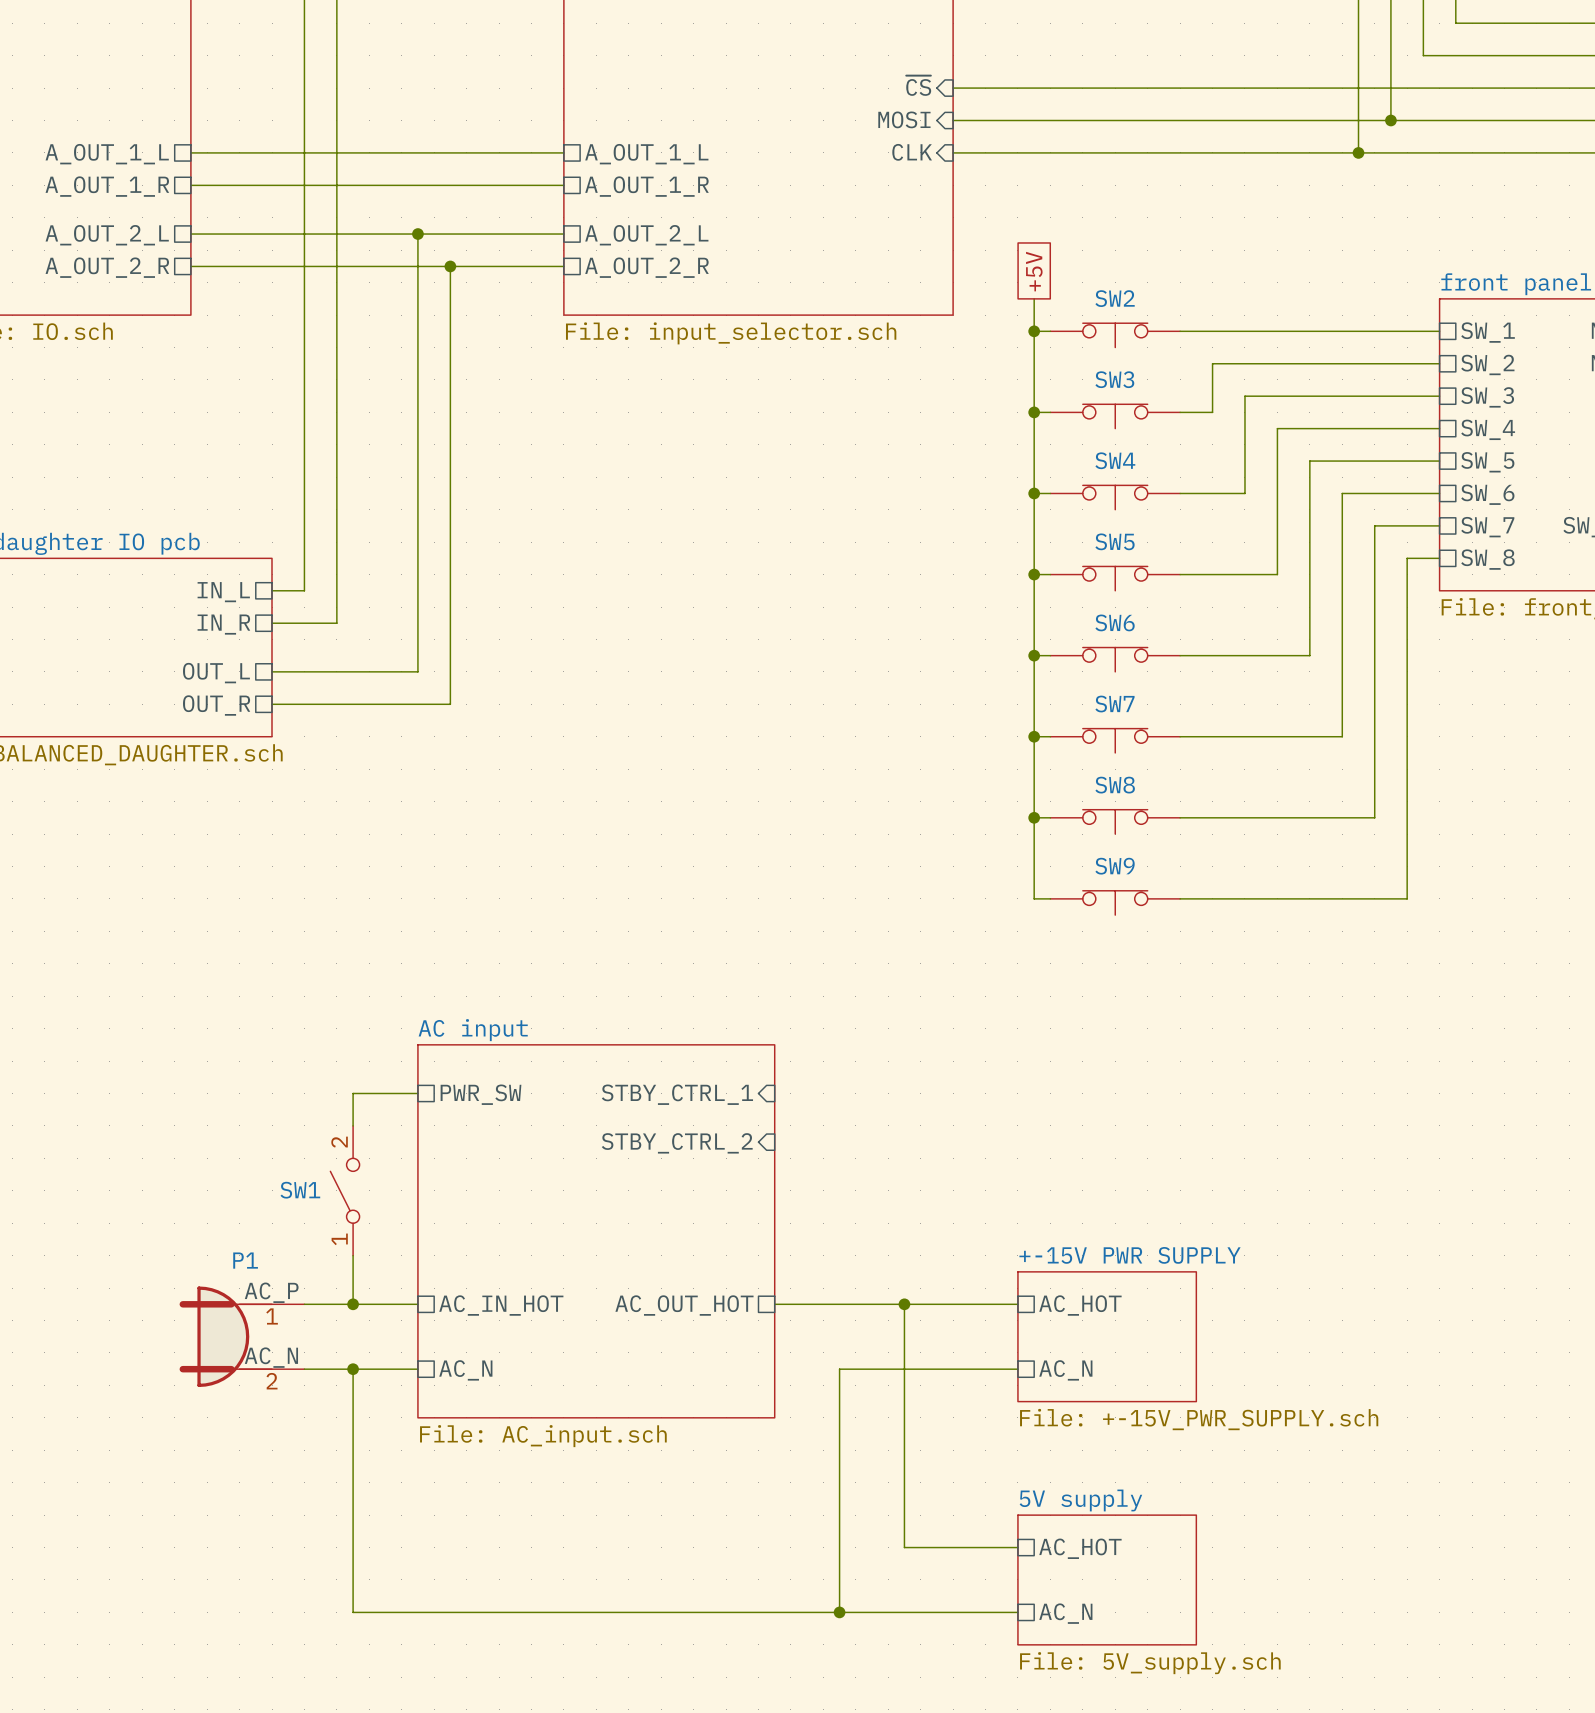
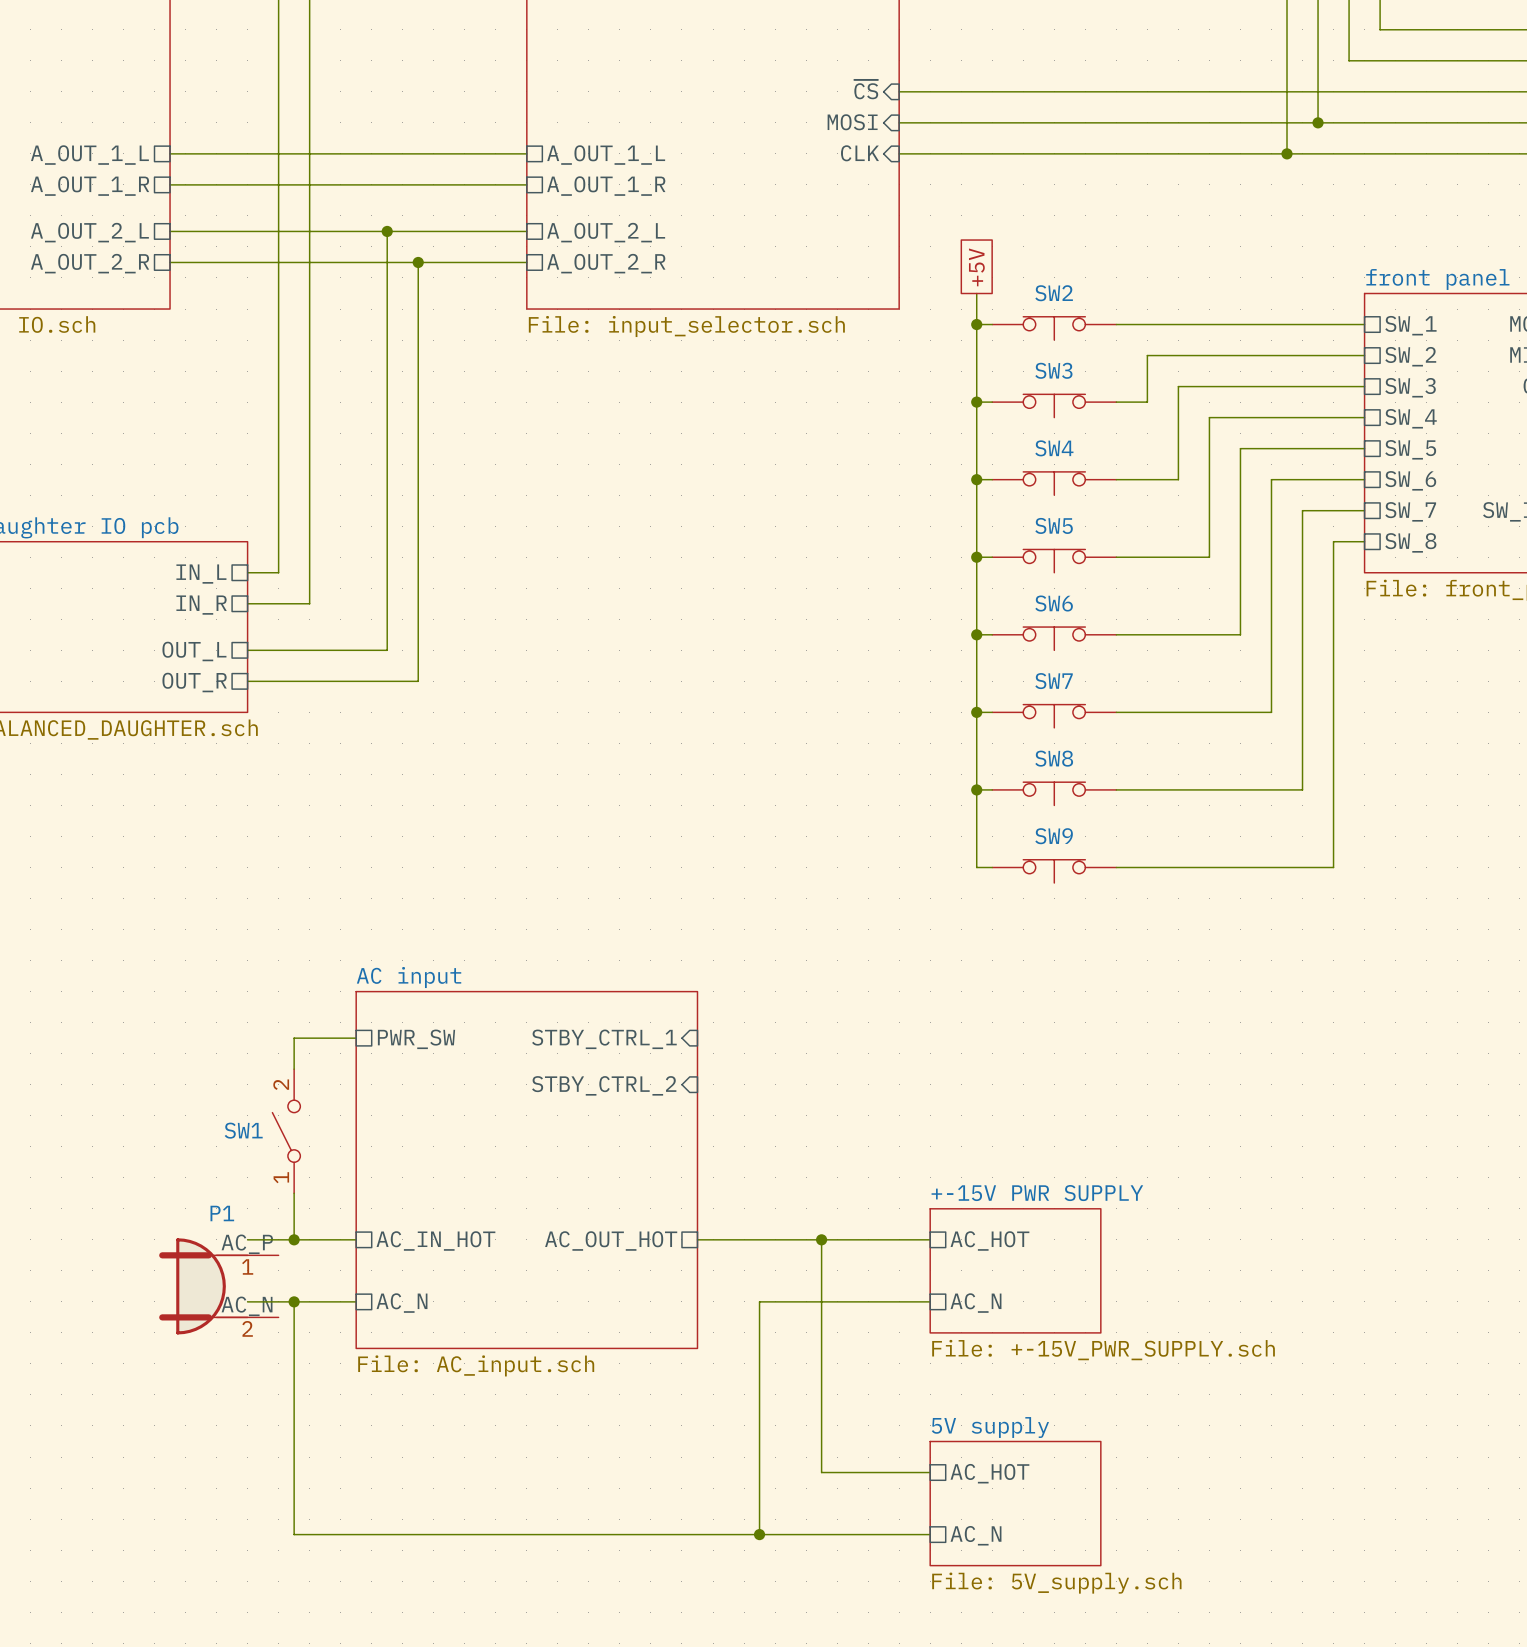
wire: (417, 1093) (353, 1093) (353, 1125) -> (356, 1038) (294, 1038) (294, 1069)
sheet pin position: PWR_SW (481, 1094) -> PWR_SW (416, 1039)
sheet pin position: STBY_CTRL_1 (677, 1094) -> STBY_CTRL_1 (604, 1039)
sheet pin position: STBY_CTRL_2 (677, 1143) -> STBY_CTRL_2 (604, 1085)
SW1 position: (344, 1190) -> (286, 1131)
sheet AC input position: (596, 1231) -> (526, 1170)
wire: (353, 1255) (353, 1304) -> (294, 1193) (294, 1239)
junction: none -> (294, 1239)
wire: (304, 1304) (417, 1304) -> (247, 1239) (356, 1239)
junction: (353, 1304) -> none
wire: (774, 1304) (1017, 1304) -> (697, 1239) (930, 1239)
wire: (904, 1304) (904, 1547) (1017, 1547) -> (821, 1239) (821, 1472) (930, 1472)
junction position: (904, 1304) -> (821, 1239)
sheet pin position: AC_IN_HOT (501, 1305) -> AC_IN_HOT (435, 1240)
sheet pin position: AC_OUT_HOT (684, 1305) -> AC_OUT_HOT (611, 1240)
sheet pin position: AC_HOT (1080, 1305) -> AC_HOT (989, 1240)
sheet +-15V PWR SUPPLY position: (1107, 1336) -> (1015, 1270)
junction: none -> (294, 1301)
wire: (304, 1369) (417, 1369) -> (247, 1301) (356, 1301)
wire: (353, 1369) (353, 1612) (1017, 1612) -> (294, 1301) (294, 1534) (930, 1534)
junction: (353, 1369) -> none
wire: (1017, 1369) (839, 1369) (839, 1612) -> (930, 1301) (759, 1301) (759, 1534)
sheet pin position: AC_N (465, 1370) -> AC_N (402, 1303)
sheet pin position: AC_N (1065, 1370) -> AC_N (976, 1303)
sheet pin position: AC_HOT (1080, 1548) -> AC_HOT (989, 1473)
sheet 5V supply position: (1107, 1579) -> (1015, 1503)
junction position: (839, 1612) -> (759, 1534)
sheet pin position: AC_N (1065, 1613) -> AC_N (976, 1535)

